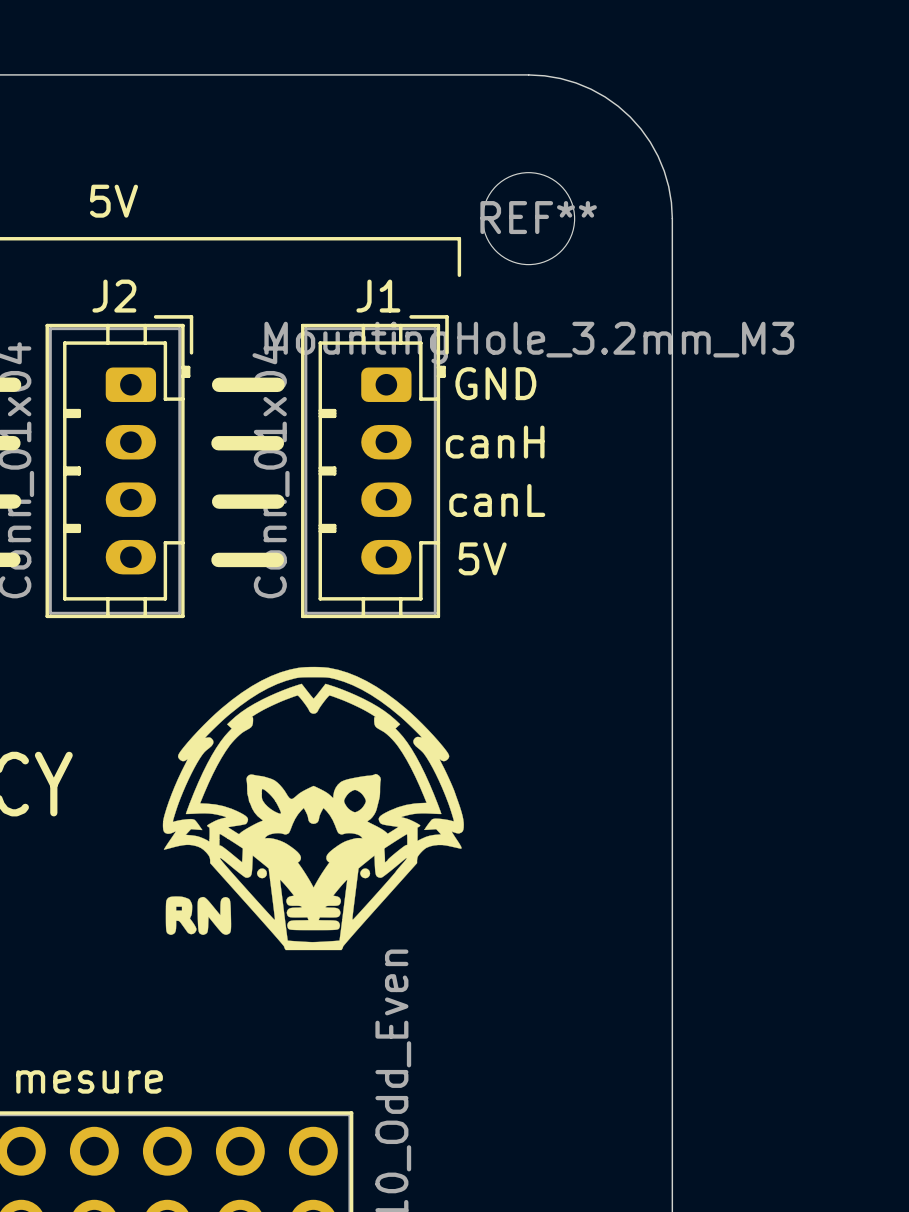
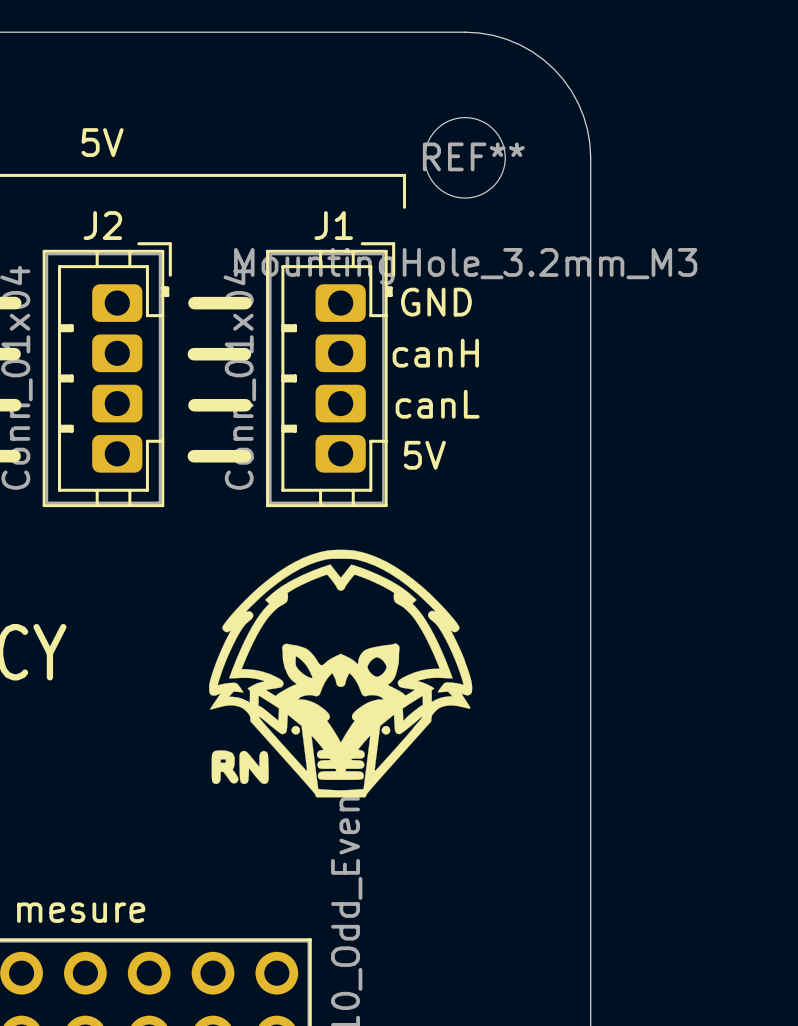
J2 footprint: [45, 315, 194, 619] -> [42, 242, 172, 508]
J1 footprint: [301, 315, 449, 619] -> [266, 242, 396, 508]
drawing position: (313, 808) -> (340, 673)

